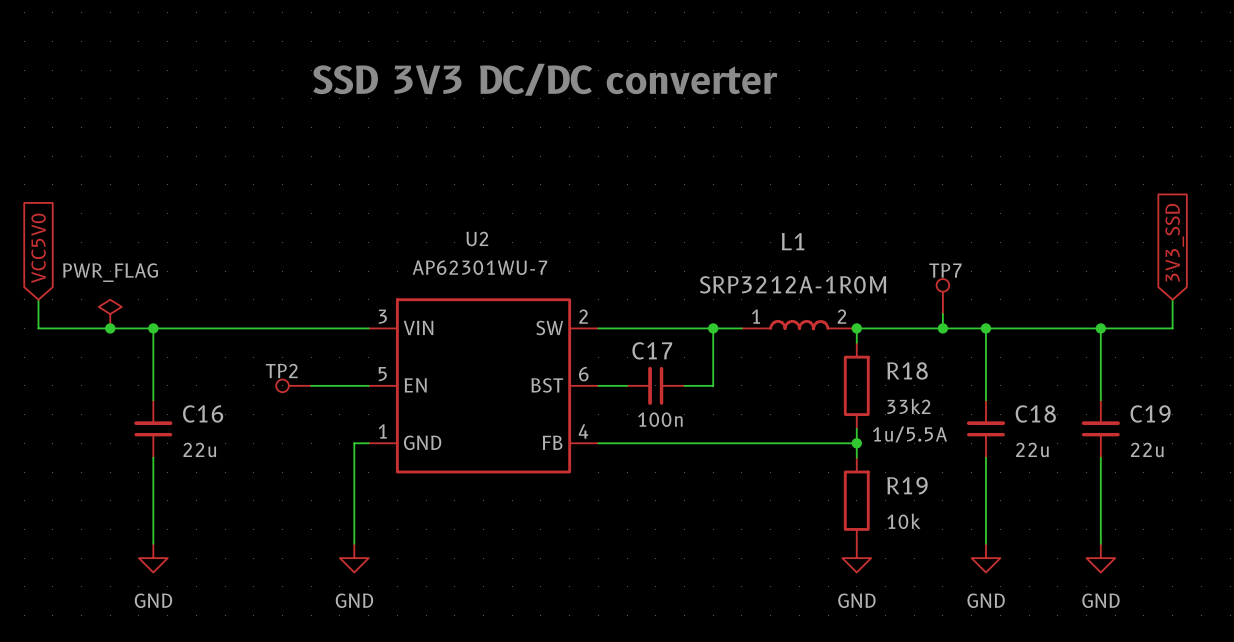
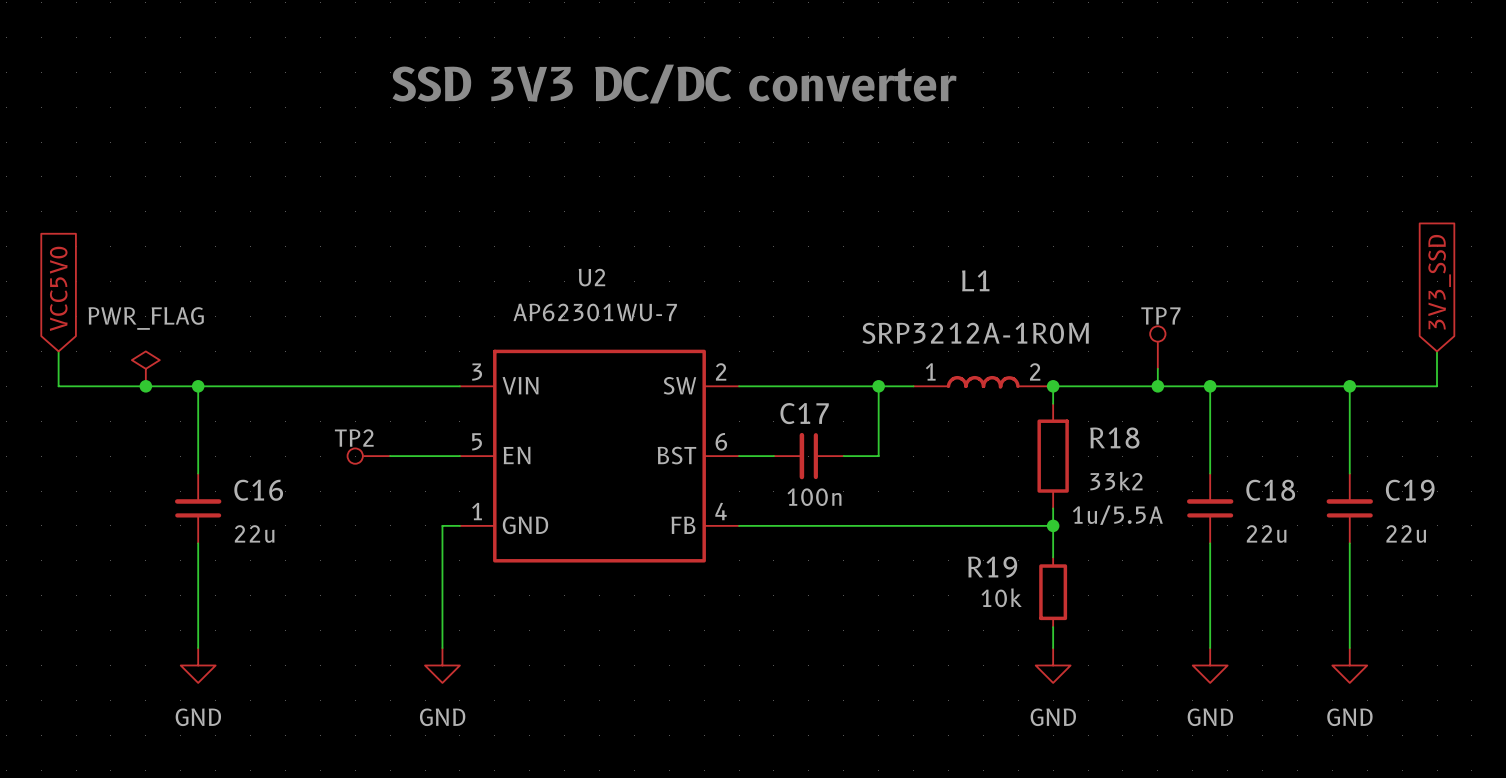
R19 symbol: [843, 457, 870, 544] -> [1039, 557, 1068, 628]
R19 name position: R19 (907, 485) -> R19 (992, 567)
R19 text position: 10k (903, 521) -> 10k (1001, 597)

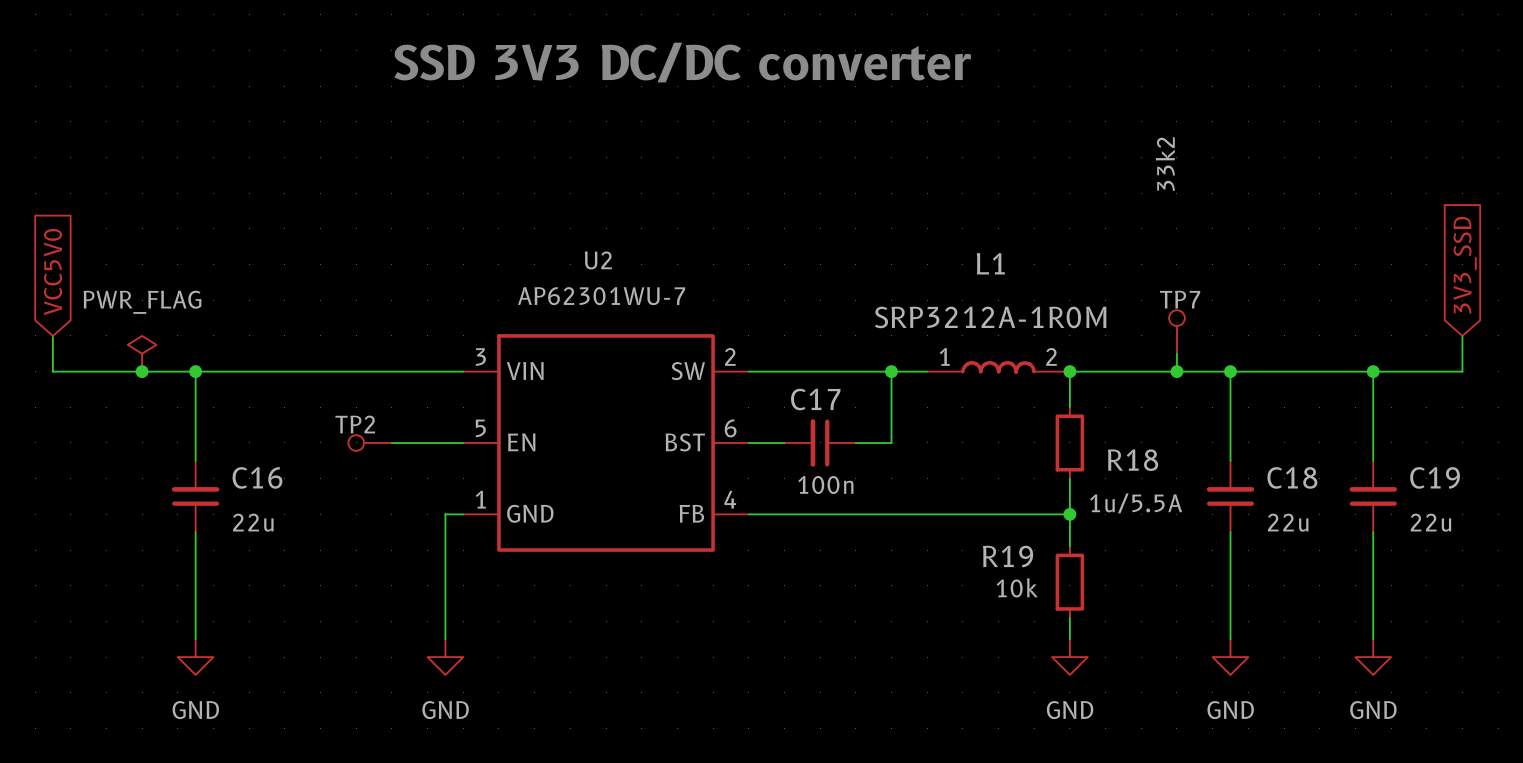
R18 symbol: [1037, 403, 1069, 509] -> [1055, 407, 1085, 479]
R18 name position: R18 (1114, 437) -> R18 (1132, 460)
R18 text position: 33k2 (1116, 481) -> 33k2 (1165, 164)

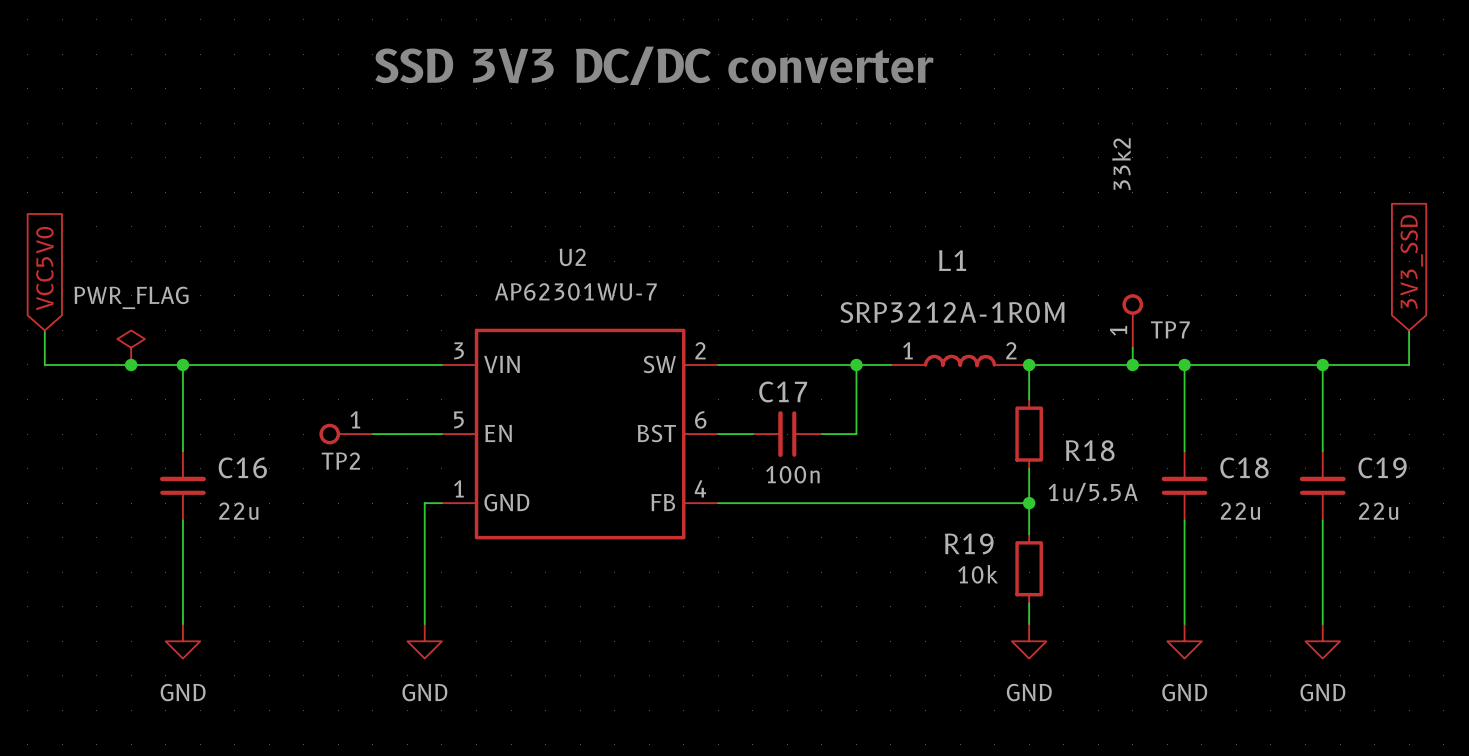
TP7 name position: TP7 (1180, 299) -> TP7 (1170, 329)
TP7 symbol: [1169, 310, 1185, 354] -> [1122, 294, 1144, 348]
TP2 name position: TP2 (355, 424) -> TP2 (340, 461)
TP2 symbol: [348, 435, 392, 451] -> [319, 423, 373, 445]

